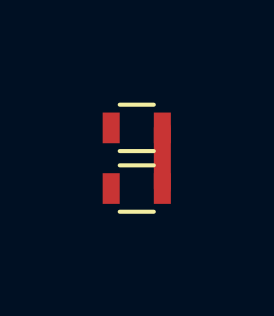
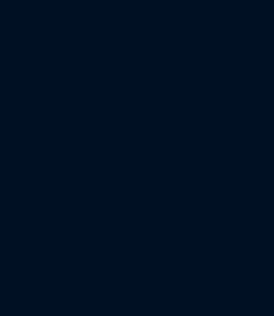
part: (136, 127) -> none
top track: (162, 127) (162, 188) -> none
part: (136, 188) -> none

